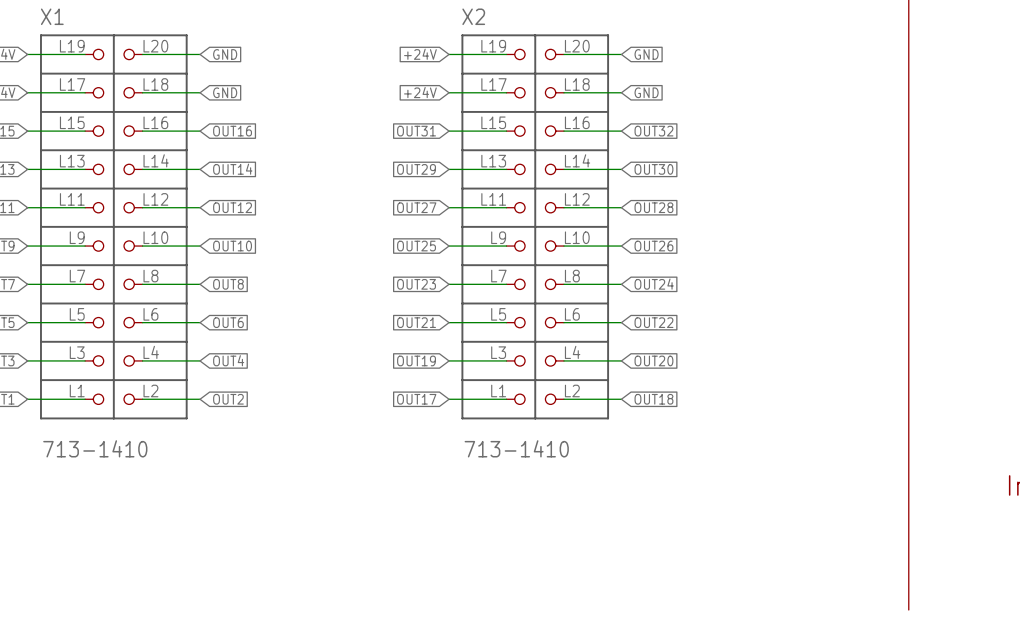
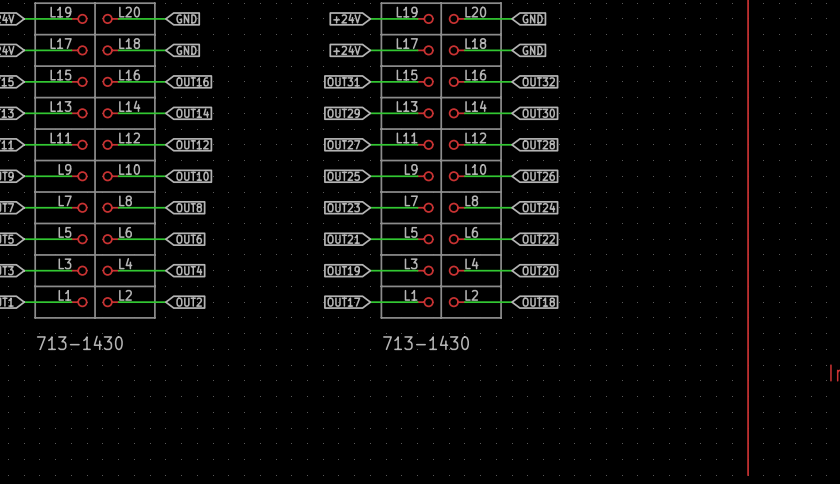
X1 value: 713-1410 (95, 448) -> 713-1430 (79, 342)
X2 value: 713-1410 (516, 448) -> 713-1430 (426, 342)

